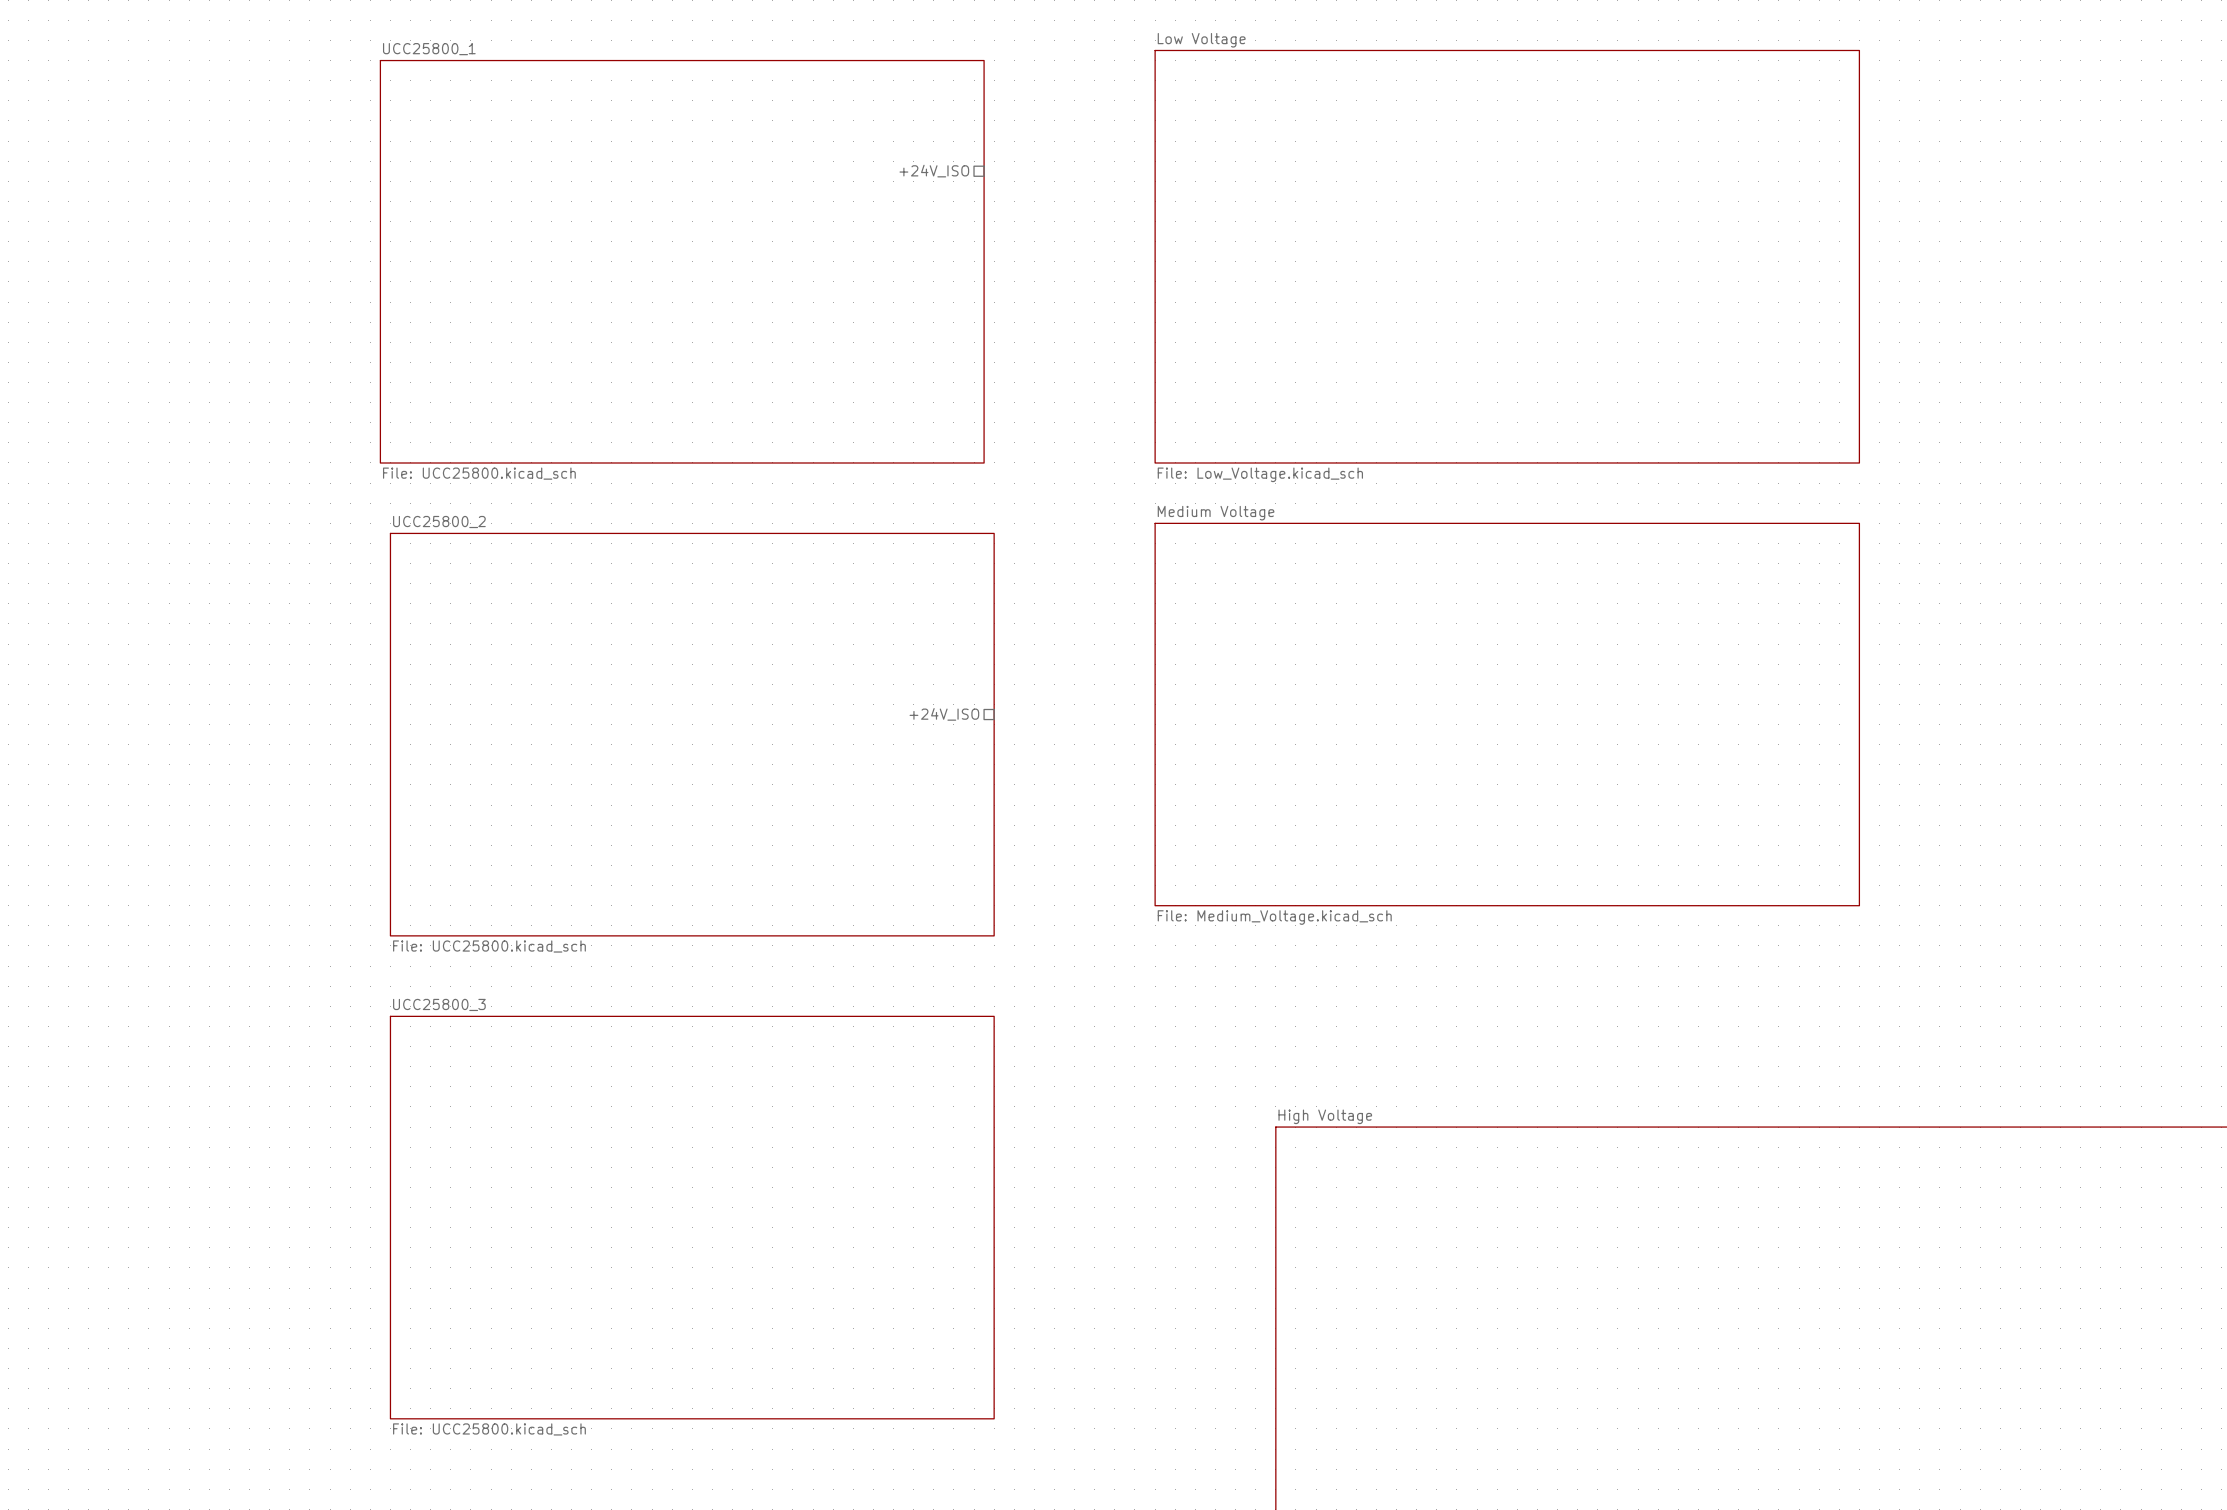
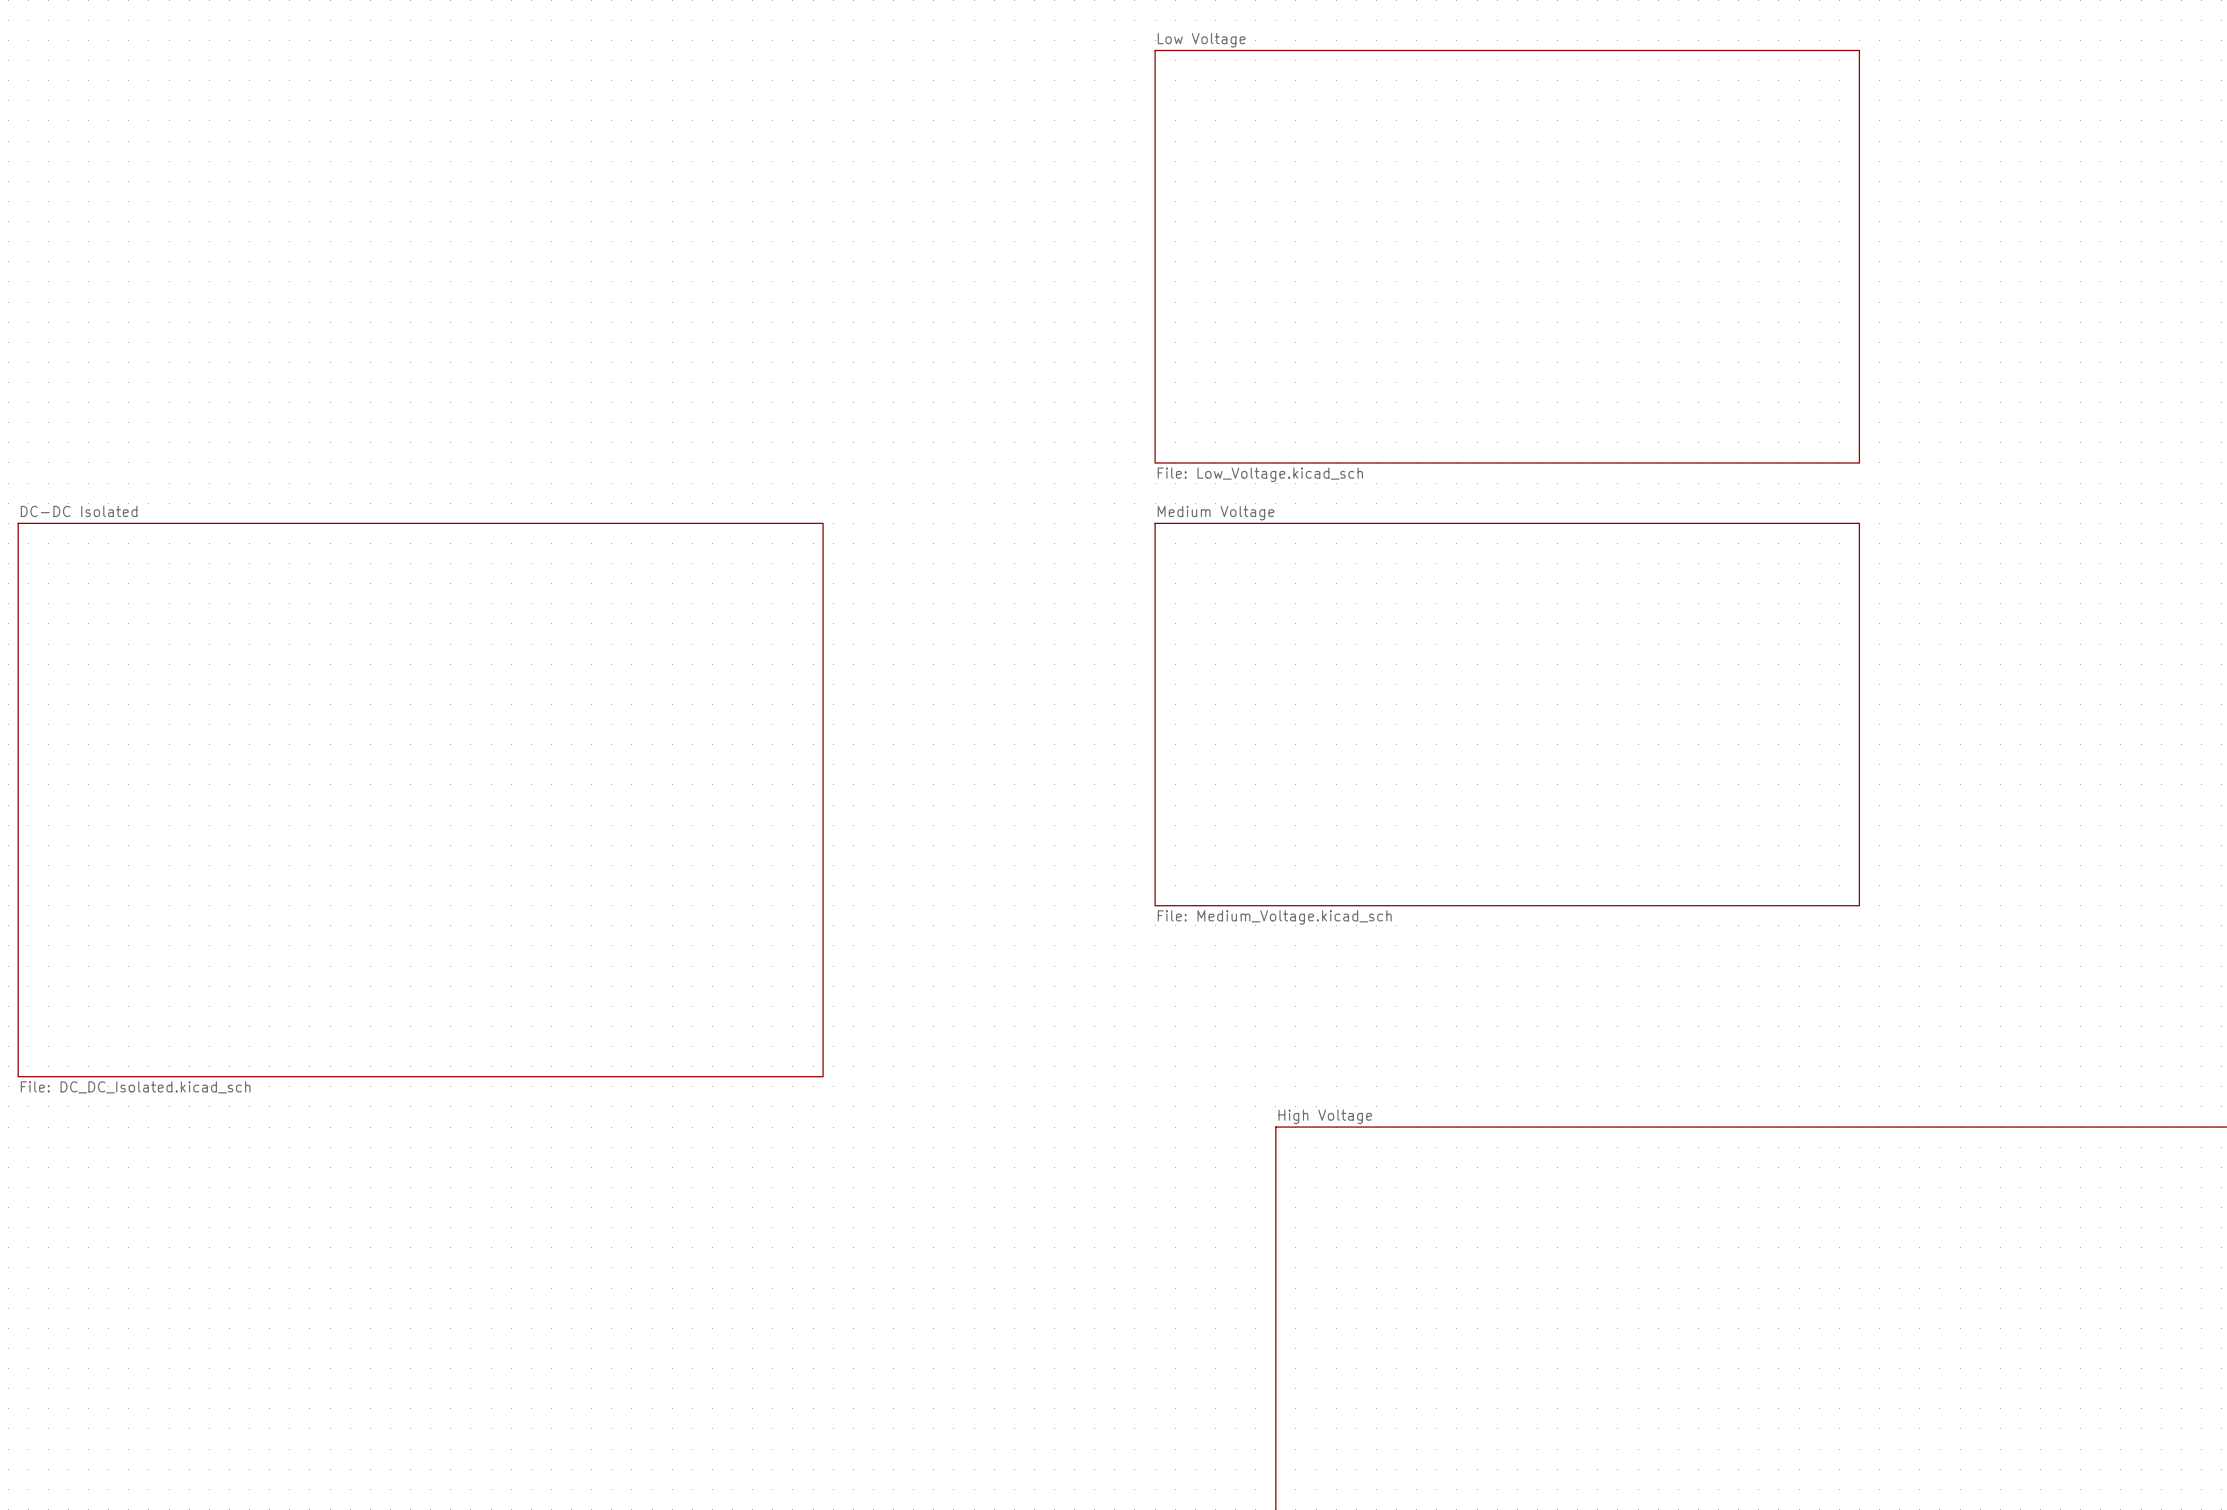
sheet pin: +24V_ISO (934, 171) -> none
sheet UCC25800_1: File: UCC25800.kicad_sch (682, 261) -> none
sheet pin: +24V_ISO (944, 714) -> none
sheet UCC25800_2: File: UCC25800.kicad_sch (692, 734) -> none
sheet DC-DC Isolated: none -> File: DC_DC_Isolated.kicad_sch (420, 800)
sheet UCC25800_3: File: UCC25800.kicad_sch (692, 1217) -> none

